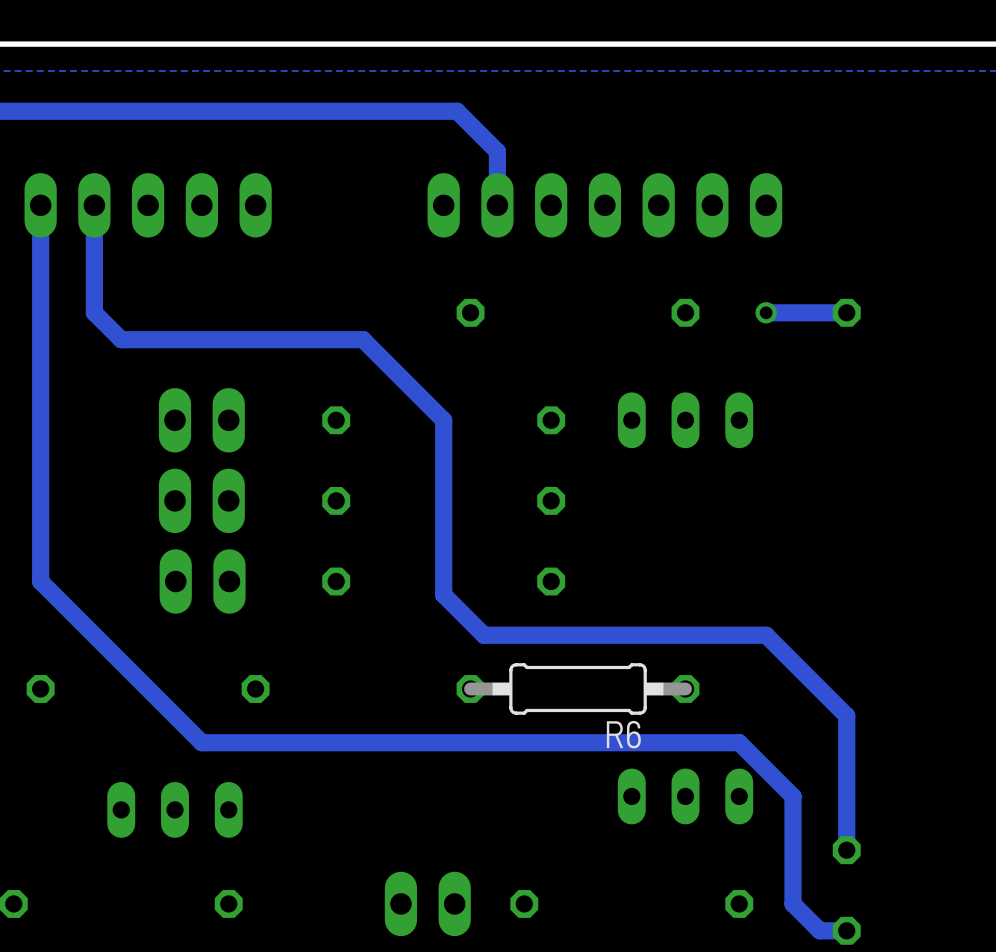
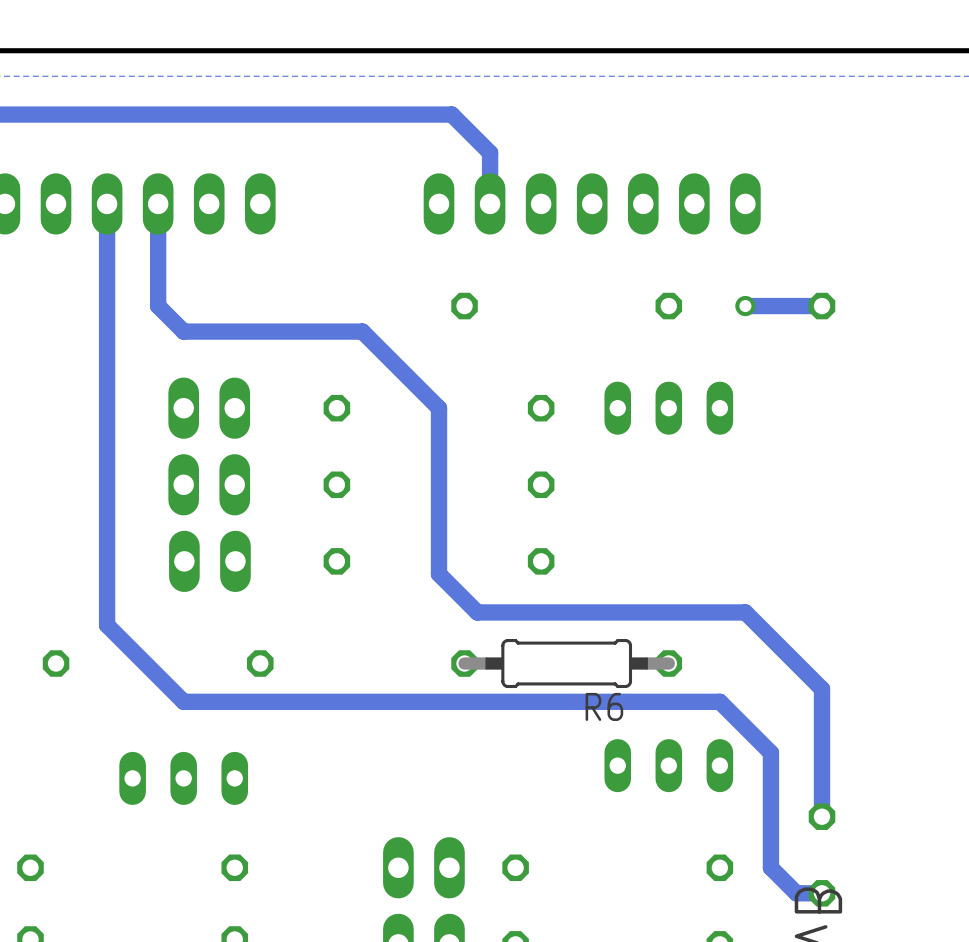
track: (40, 205) (40, 581) (201, 742) (739, 742) (793, 796) -> (107, 306) (107, 625) (183, 701) (719, 701) (770, 752) (770, 765)
track: (94, 312) (121, 339) (174, 339) -> (158, 203) (158, 306) (183, 331)

